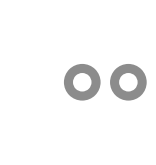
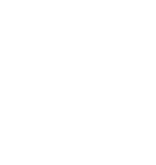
part: (105, 82) -> none

